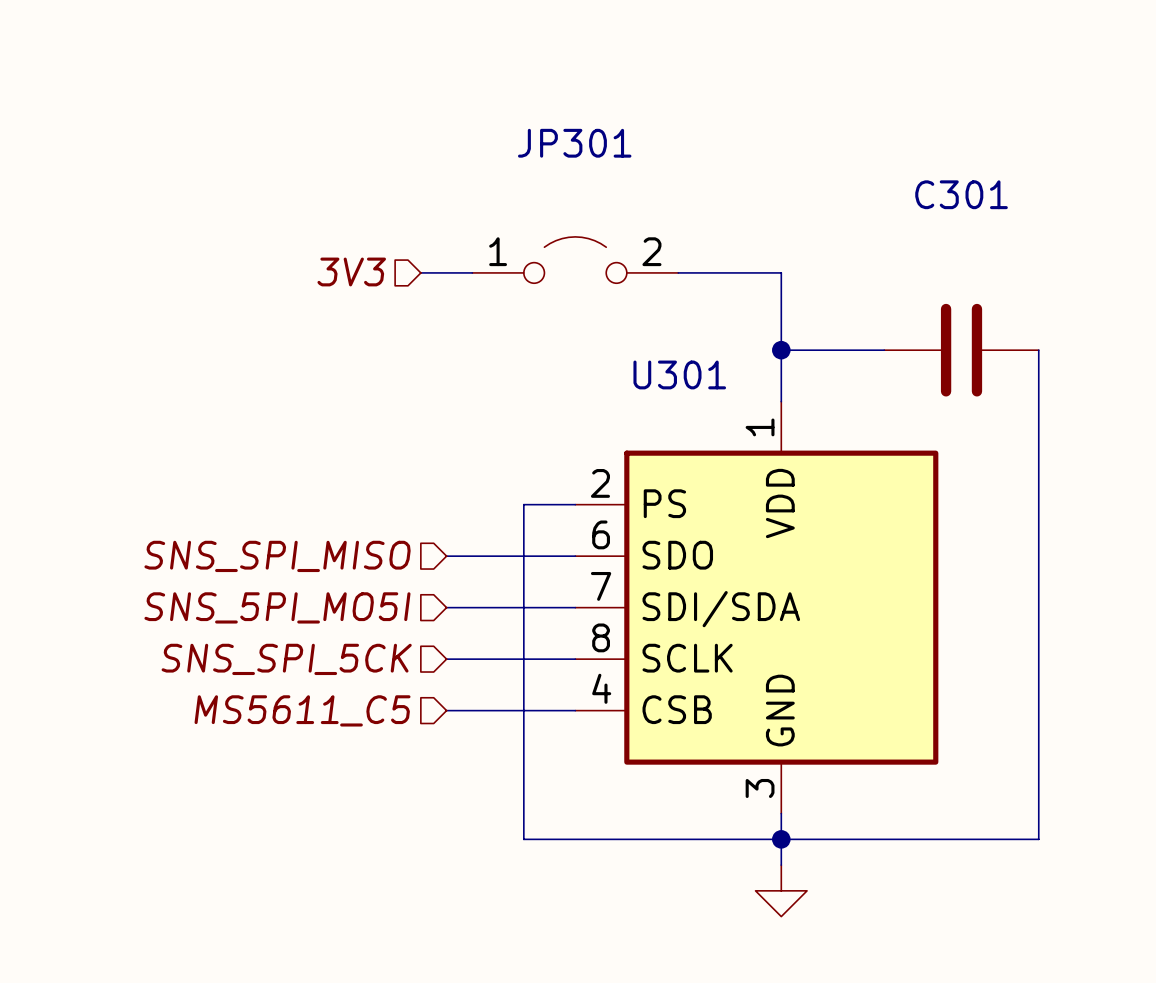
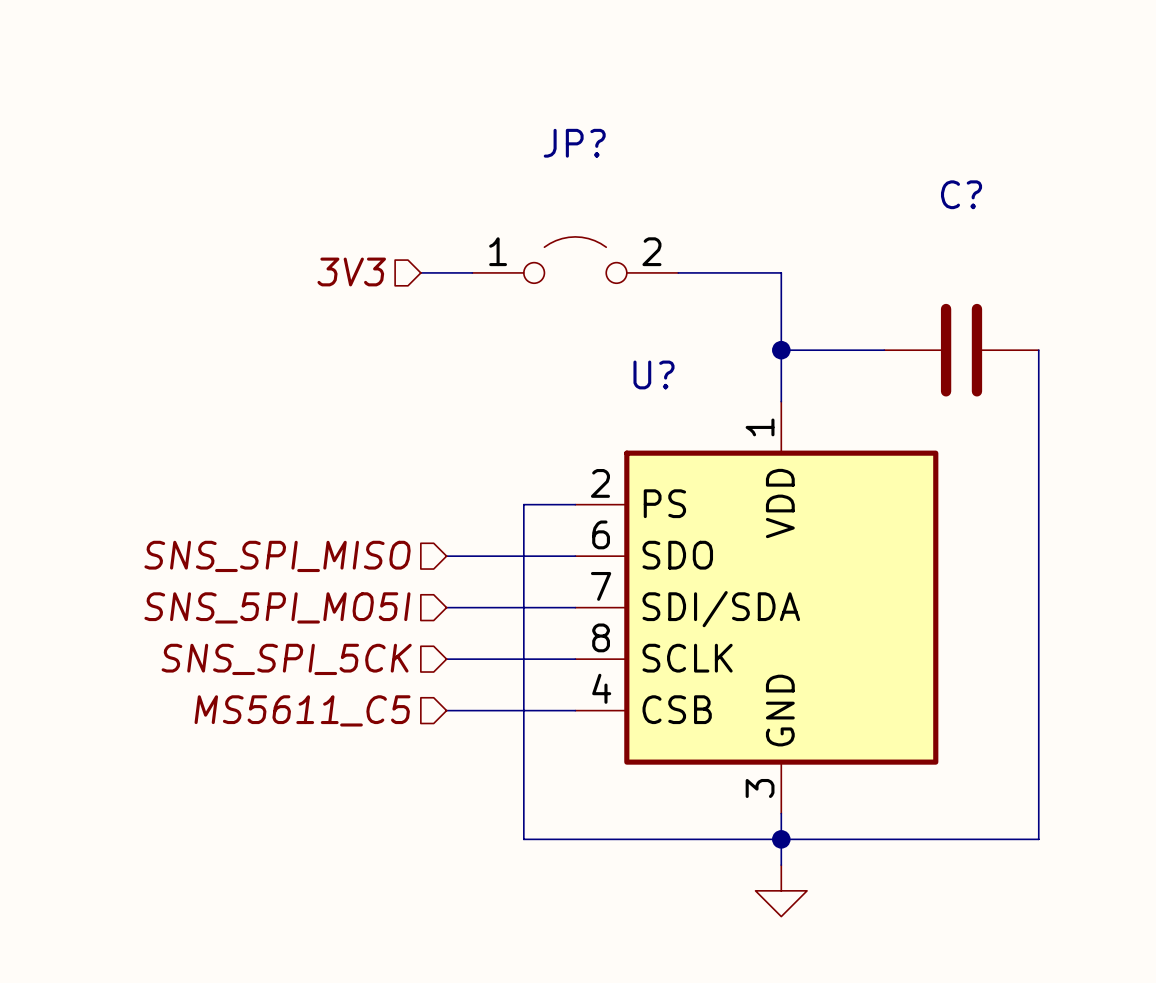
JP301 name: JP301 (574, 143) -> JP? (574, 143)
C301 name: C301 (961, 194) -> C? (961, 194)
U301 name: U301 (679, 374) -> U? (653, 374)

